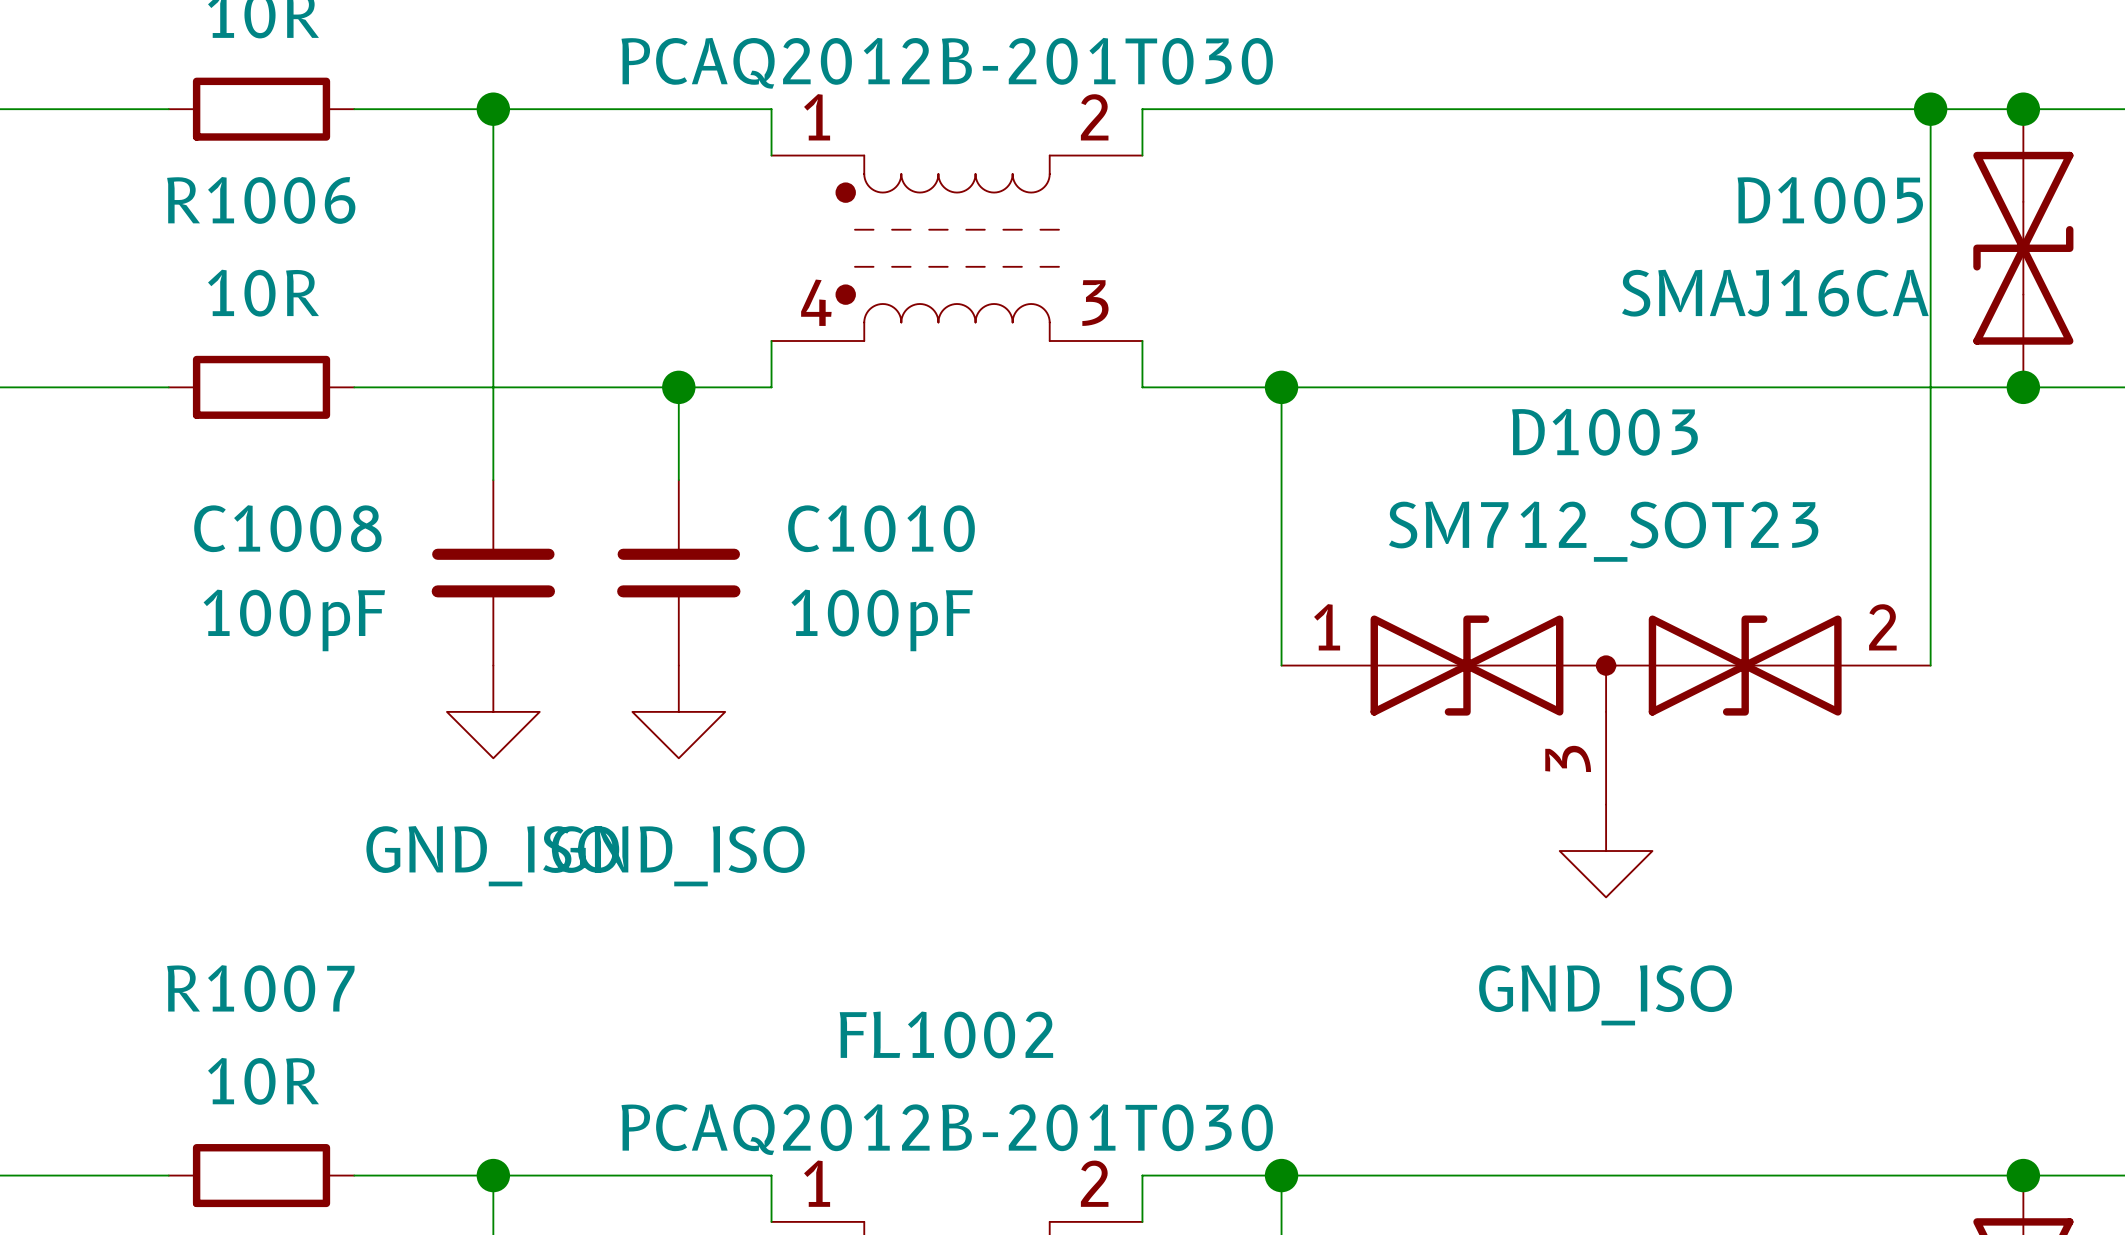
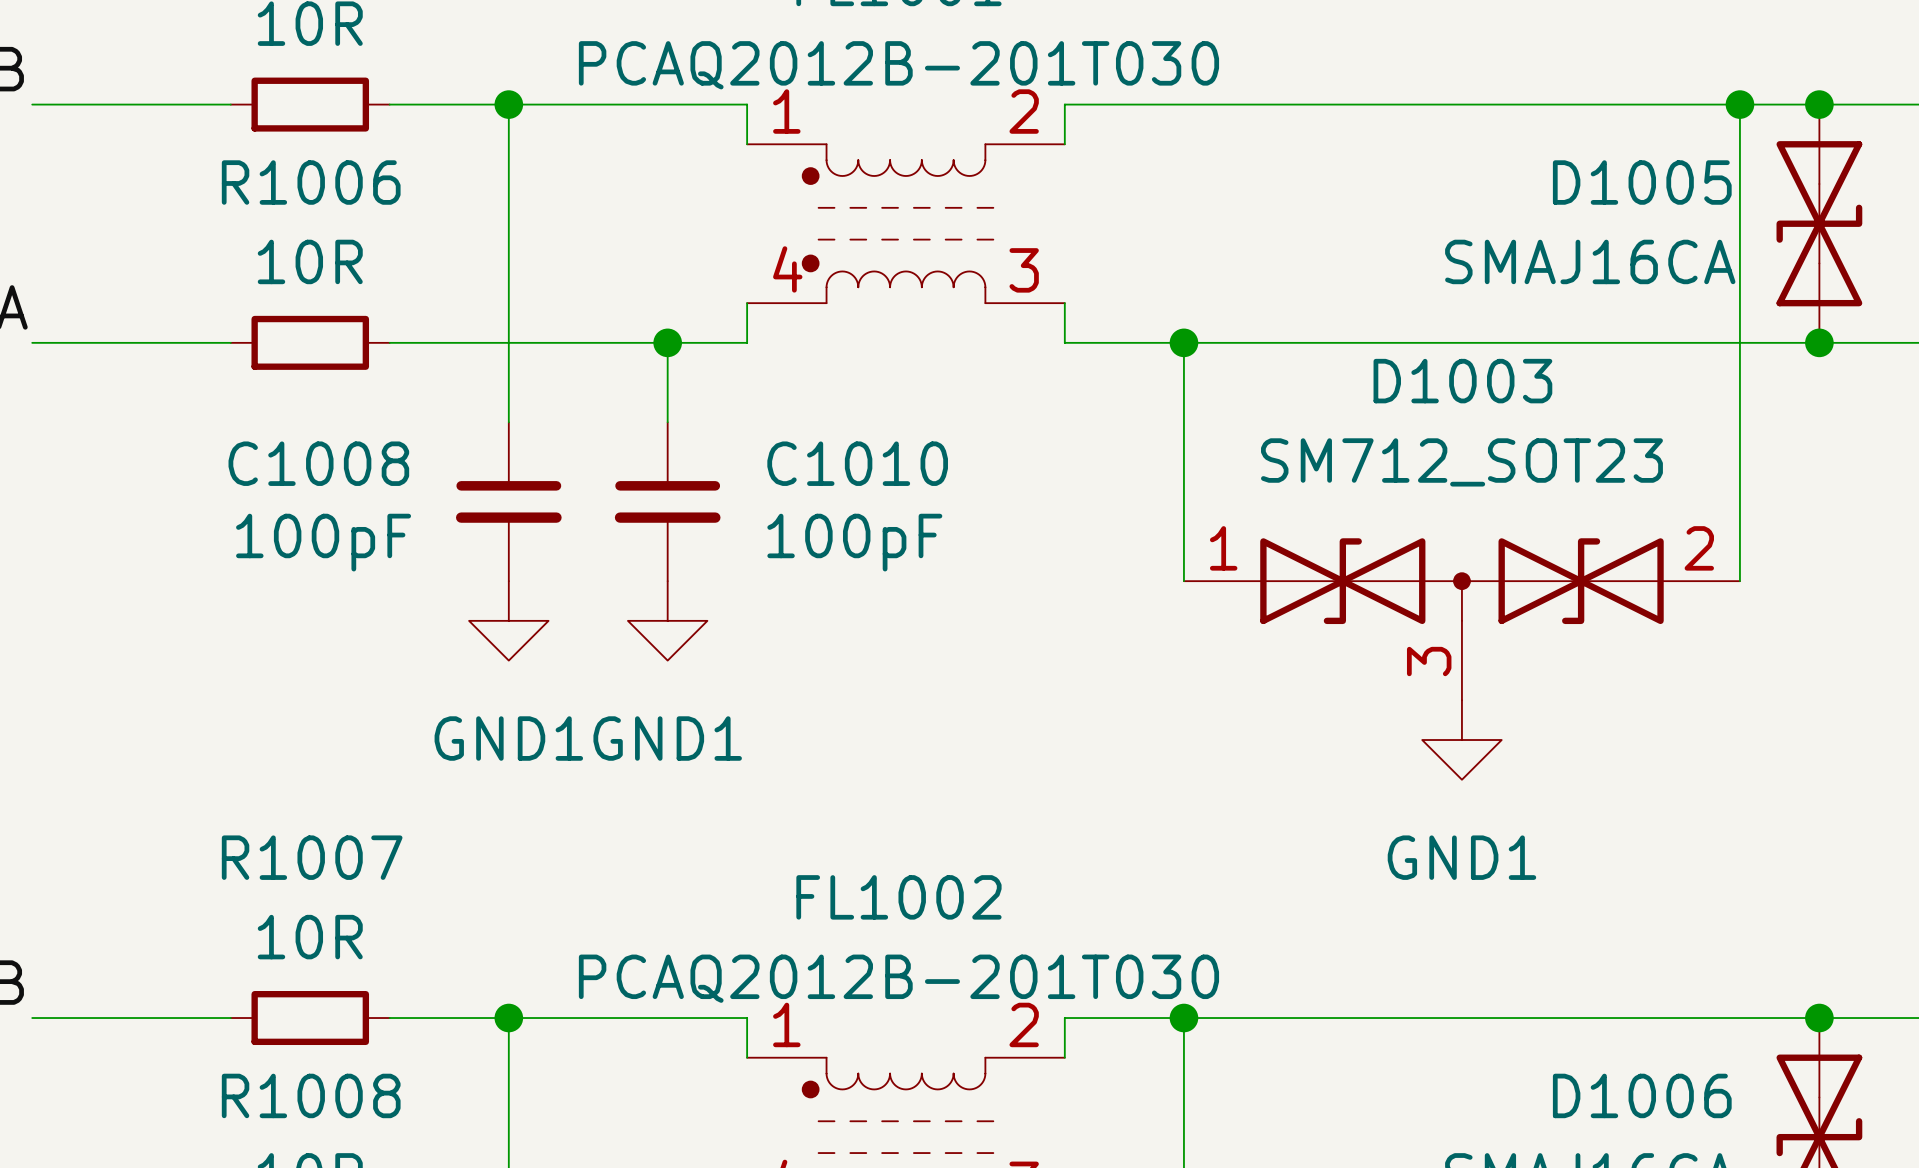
power symbol: GND_ISO (493, 711) -> GND1 (508, 620)
power symbol: GND_ISO (678, 711) -> GND1 (667, 620)
power symbol: GND_ISO (1606, 851) -> GND1 (1461, 740)

